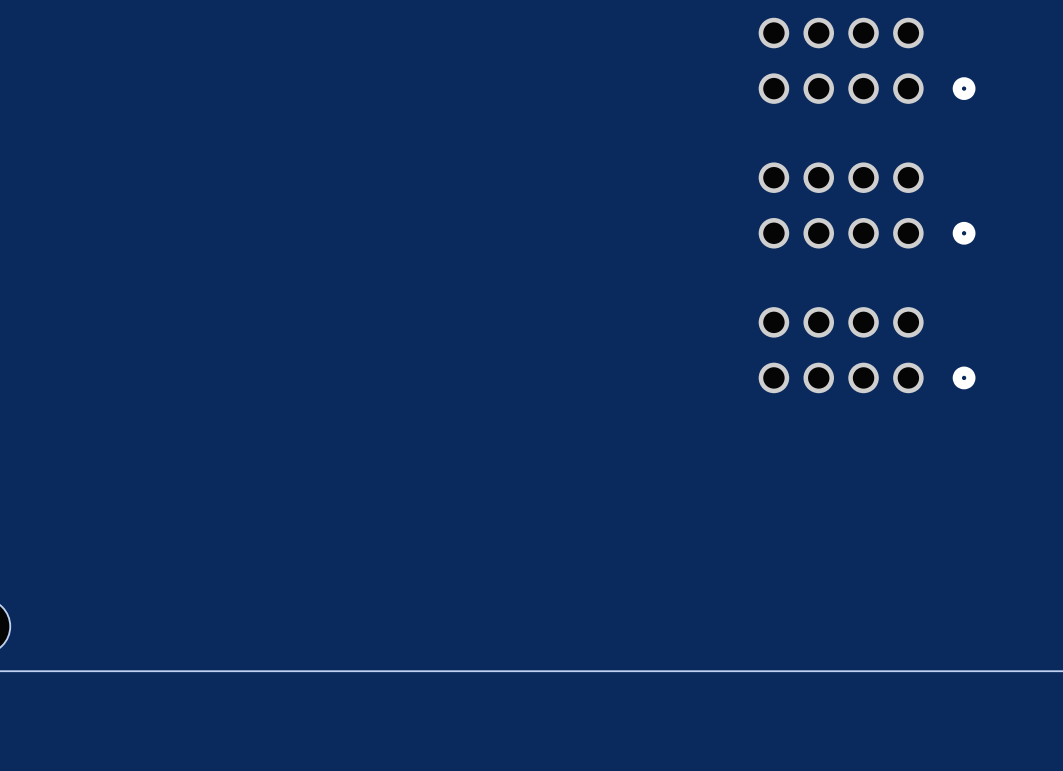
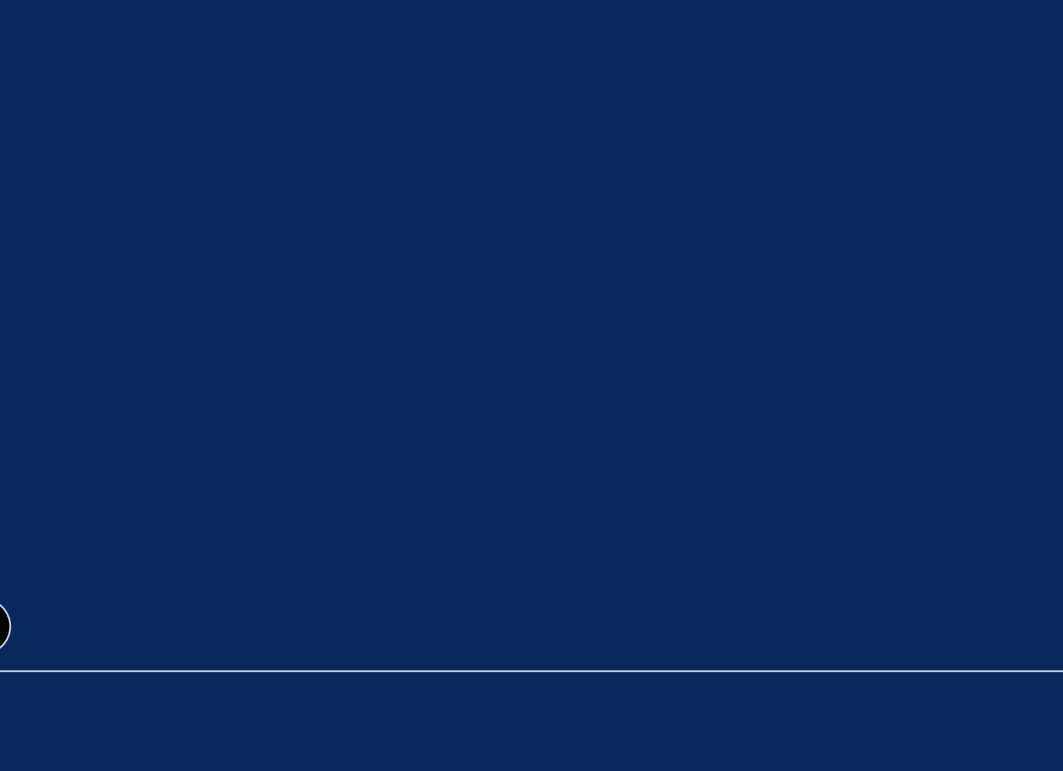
part: (867, 60) -> none
part: (867, 205) -> none
part: (867, 350) -> none

